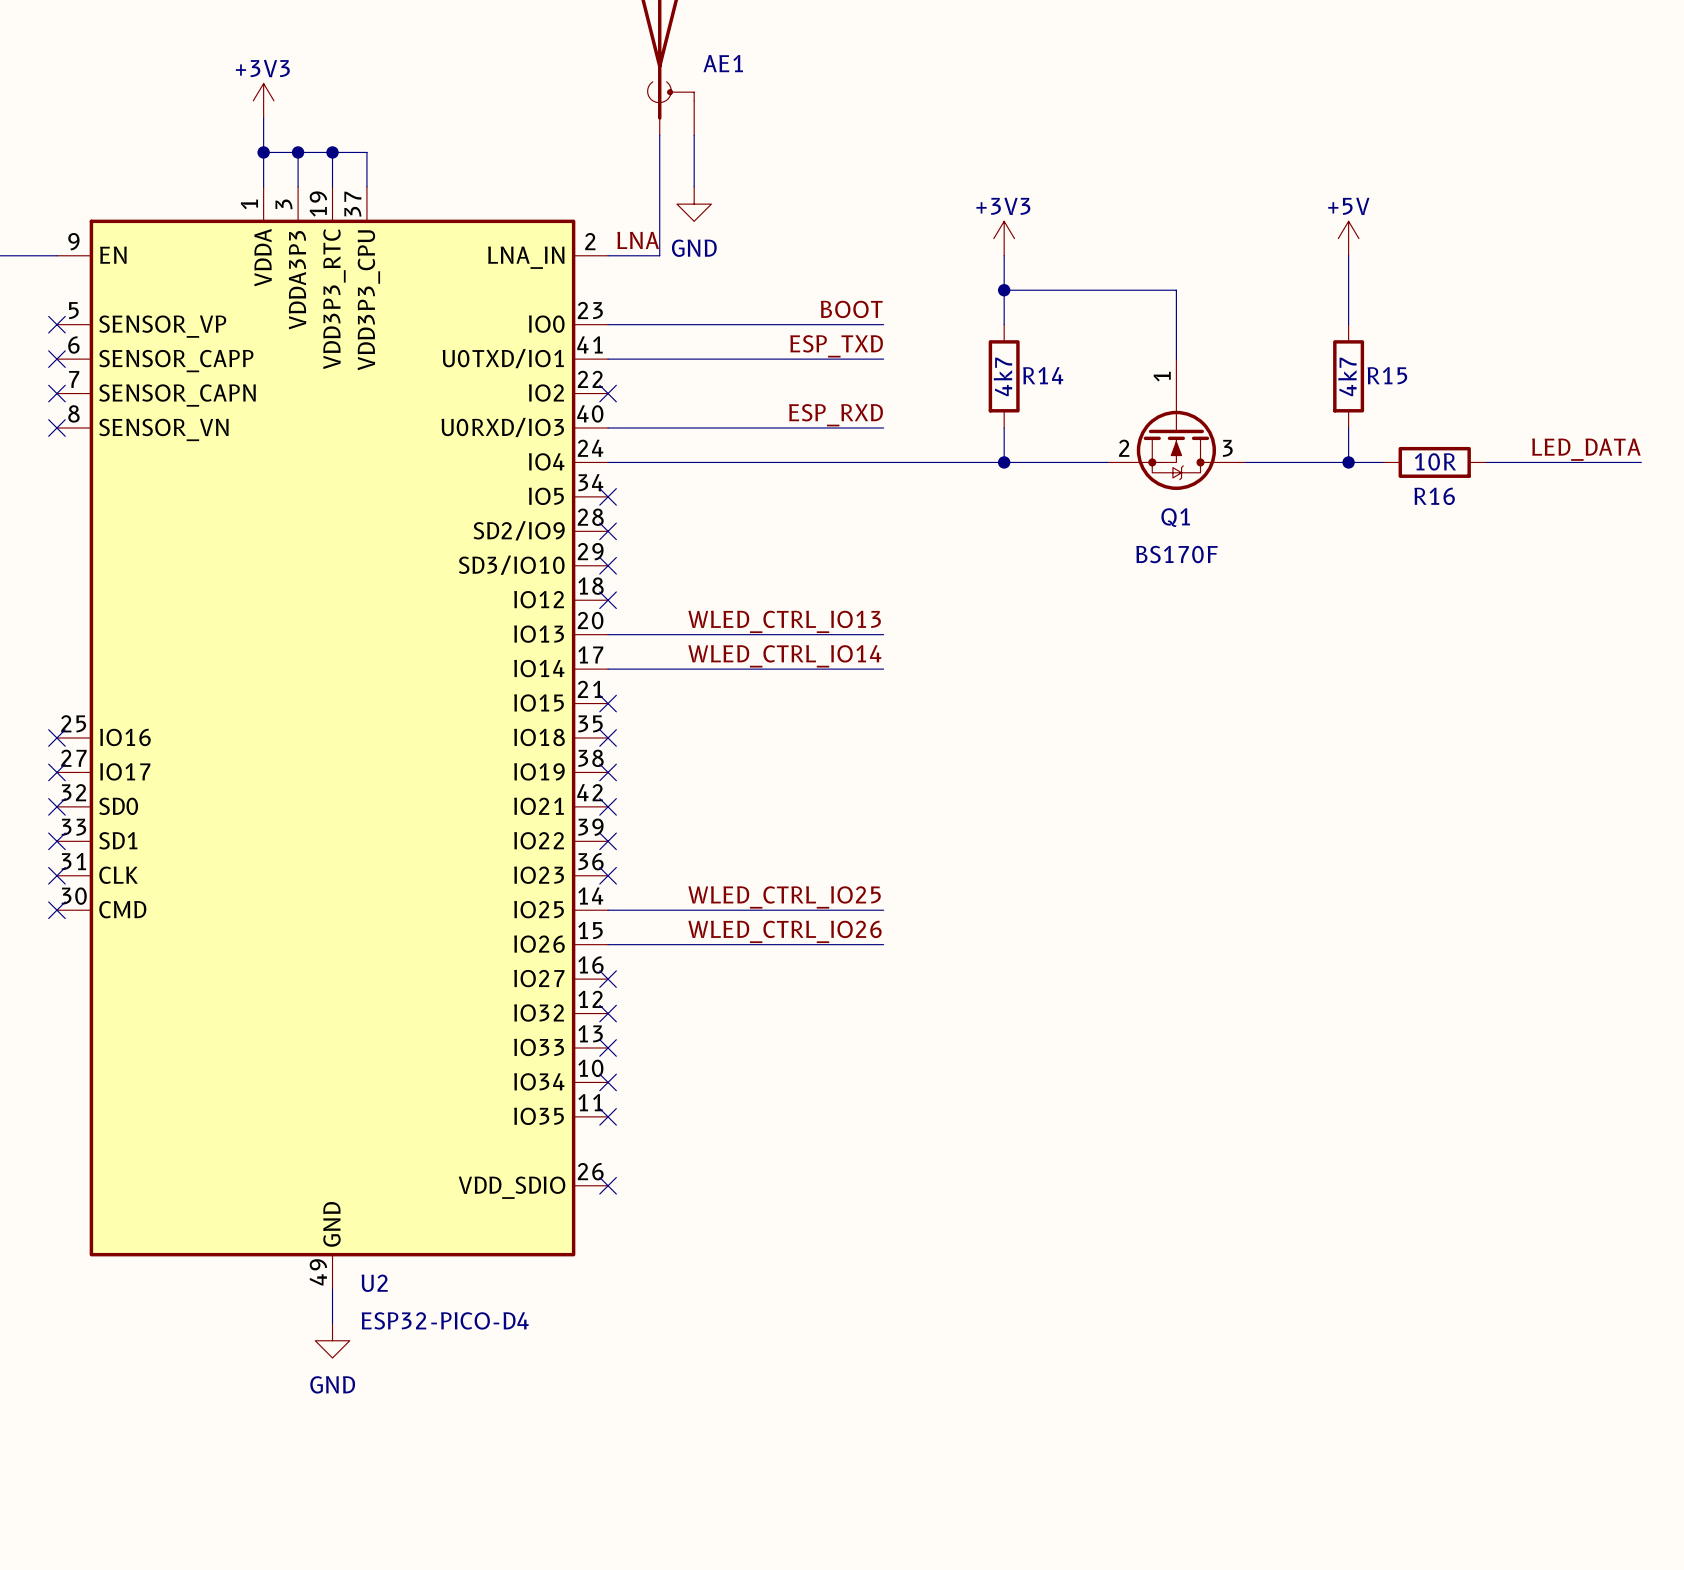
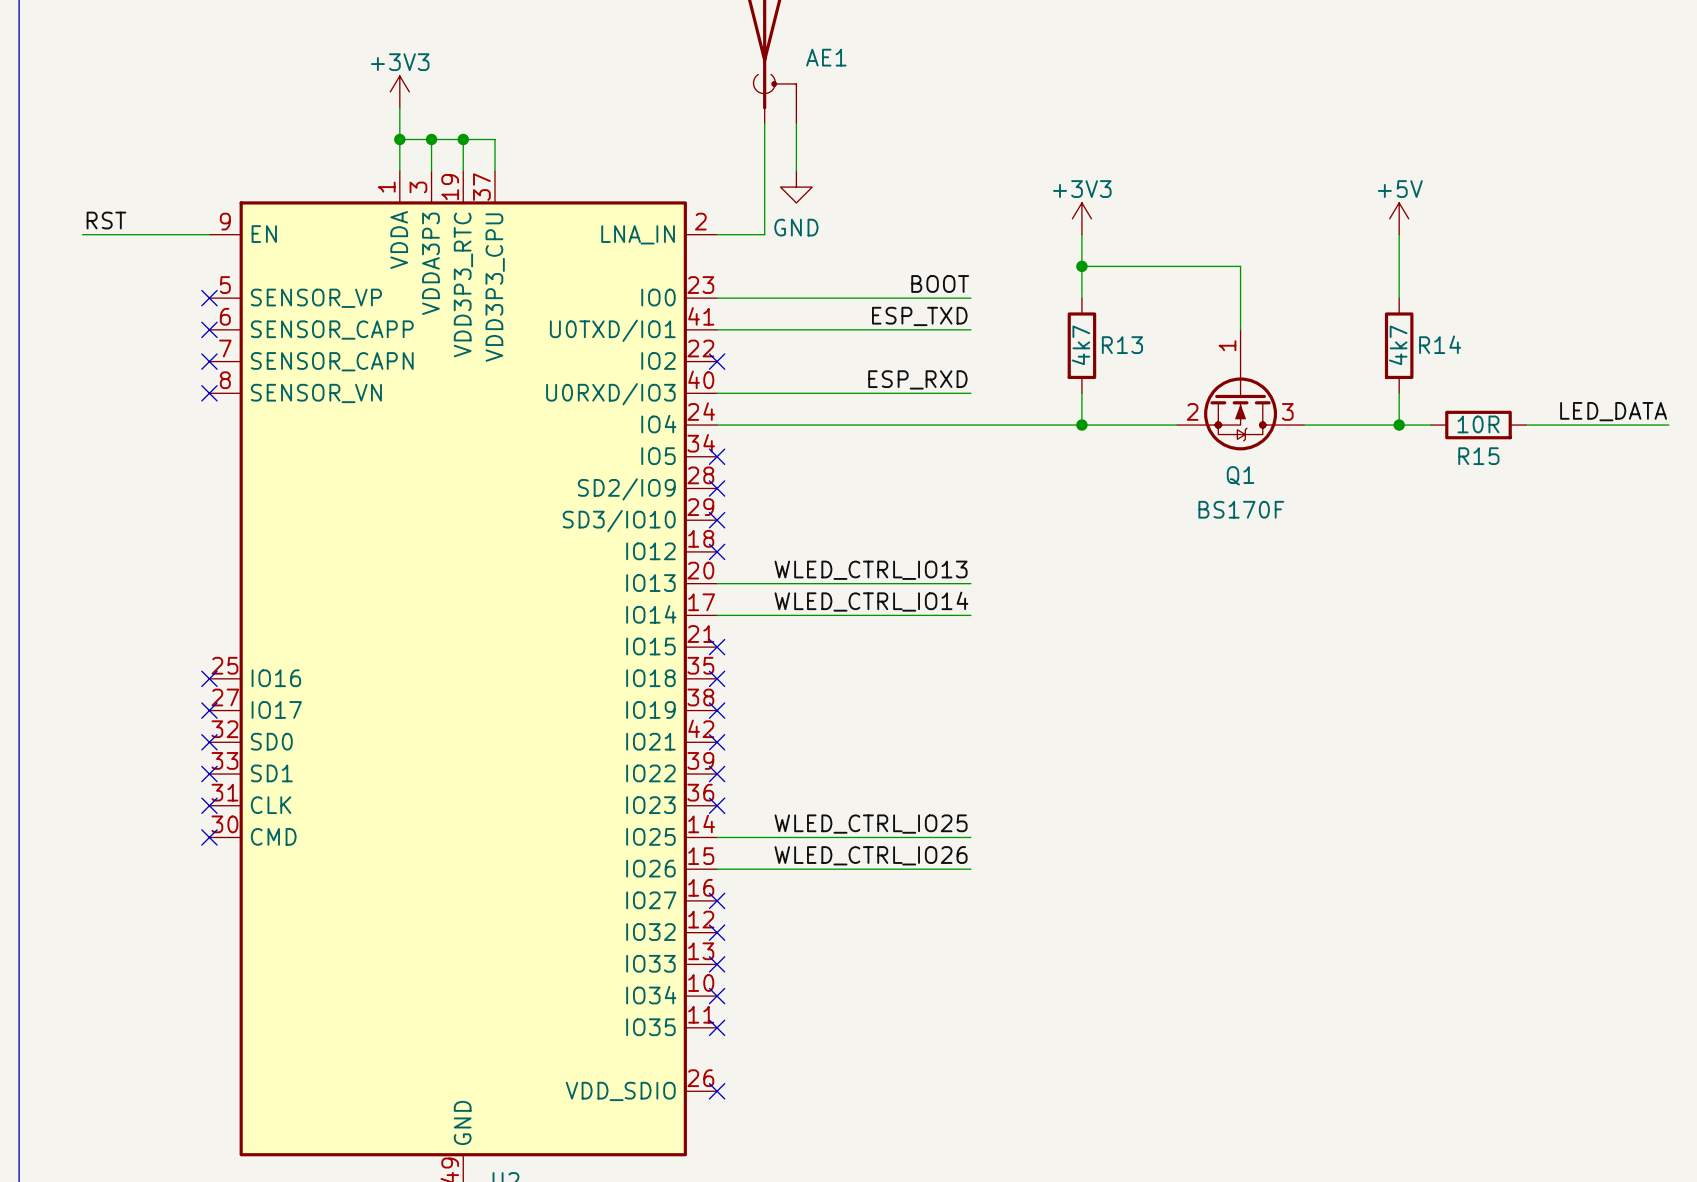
label: LNA (638, 240) -> none
R14 name: R14 (1043, 375) -> R13 (1122, 345)
R15 name: R15 (1387, 375) -> R14 (1440, 344)
R16 name: R16 (1434, 496) -> R15 (1478, 456)

